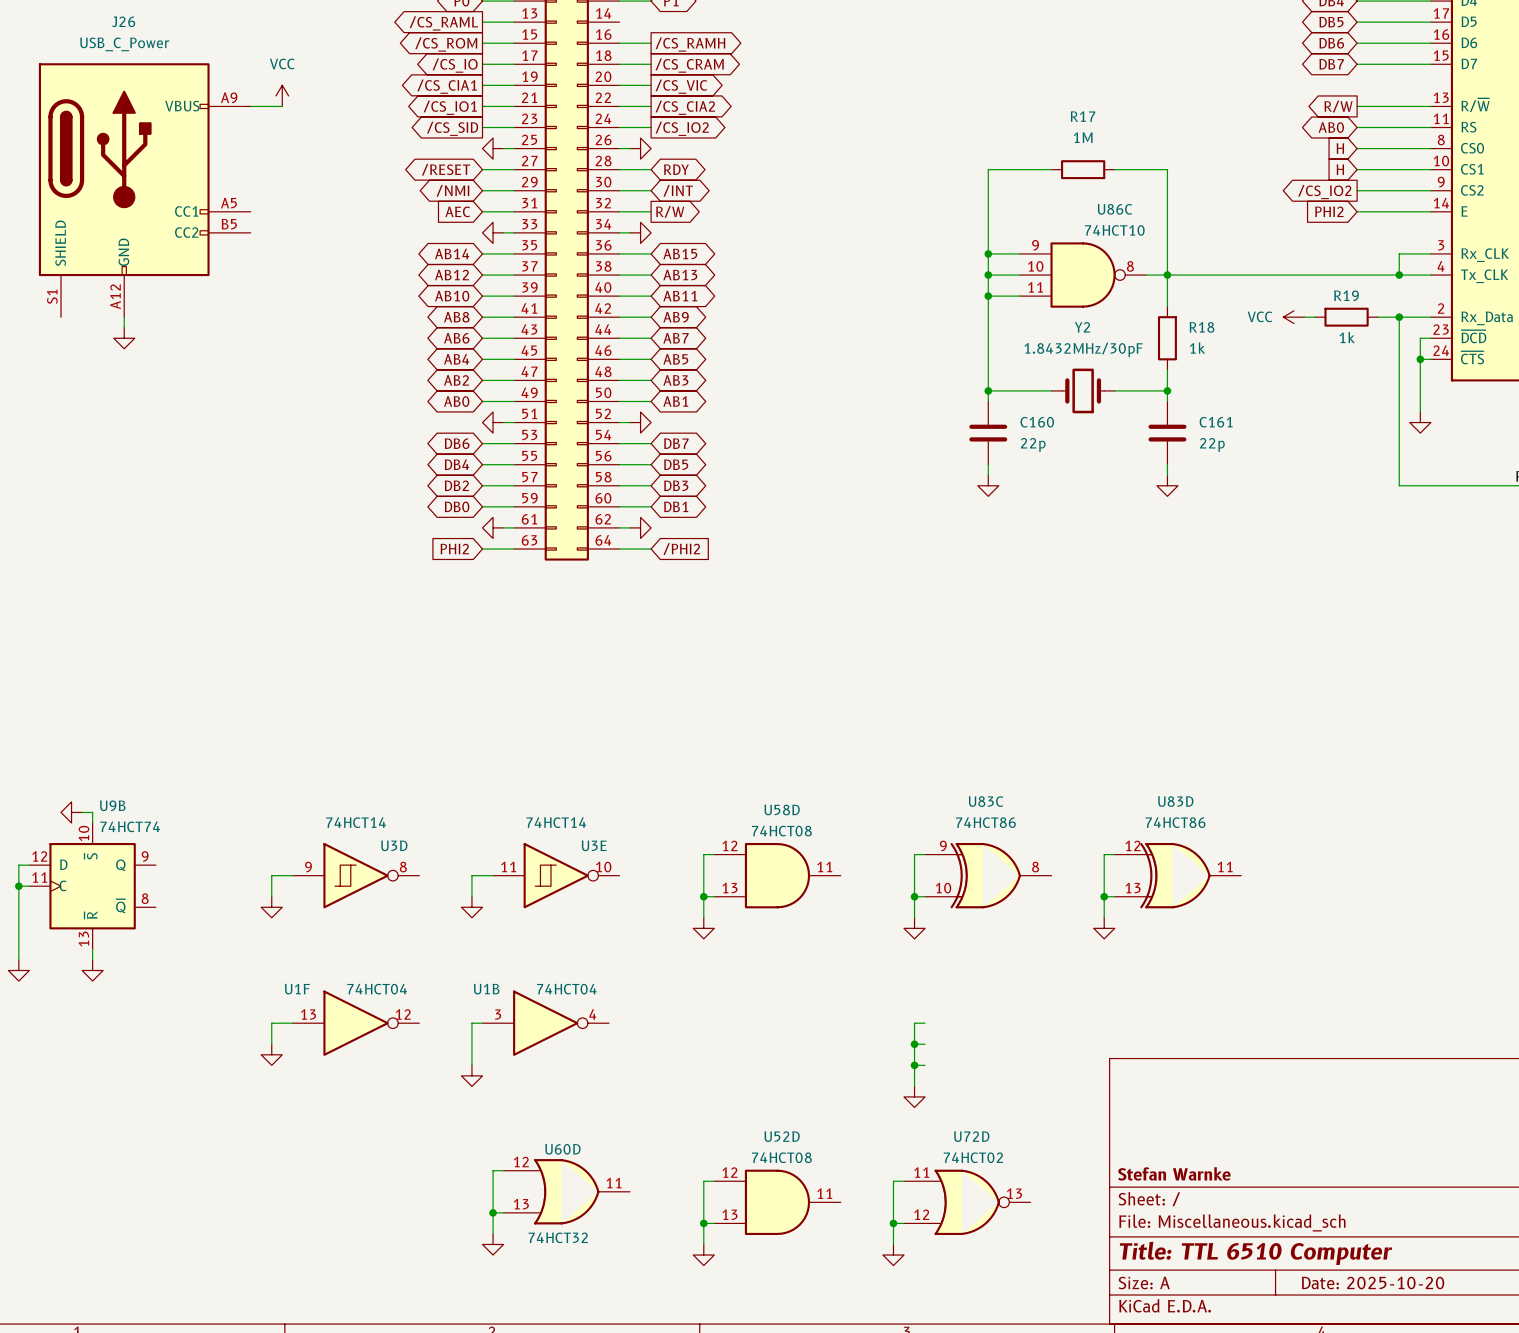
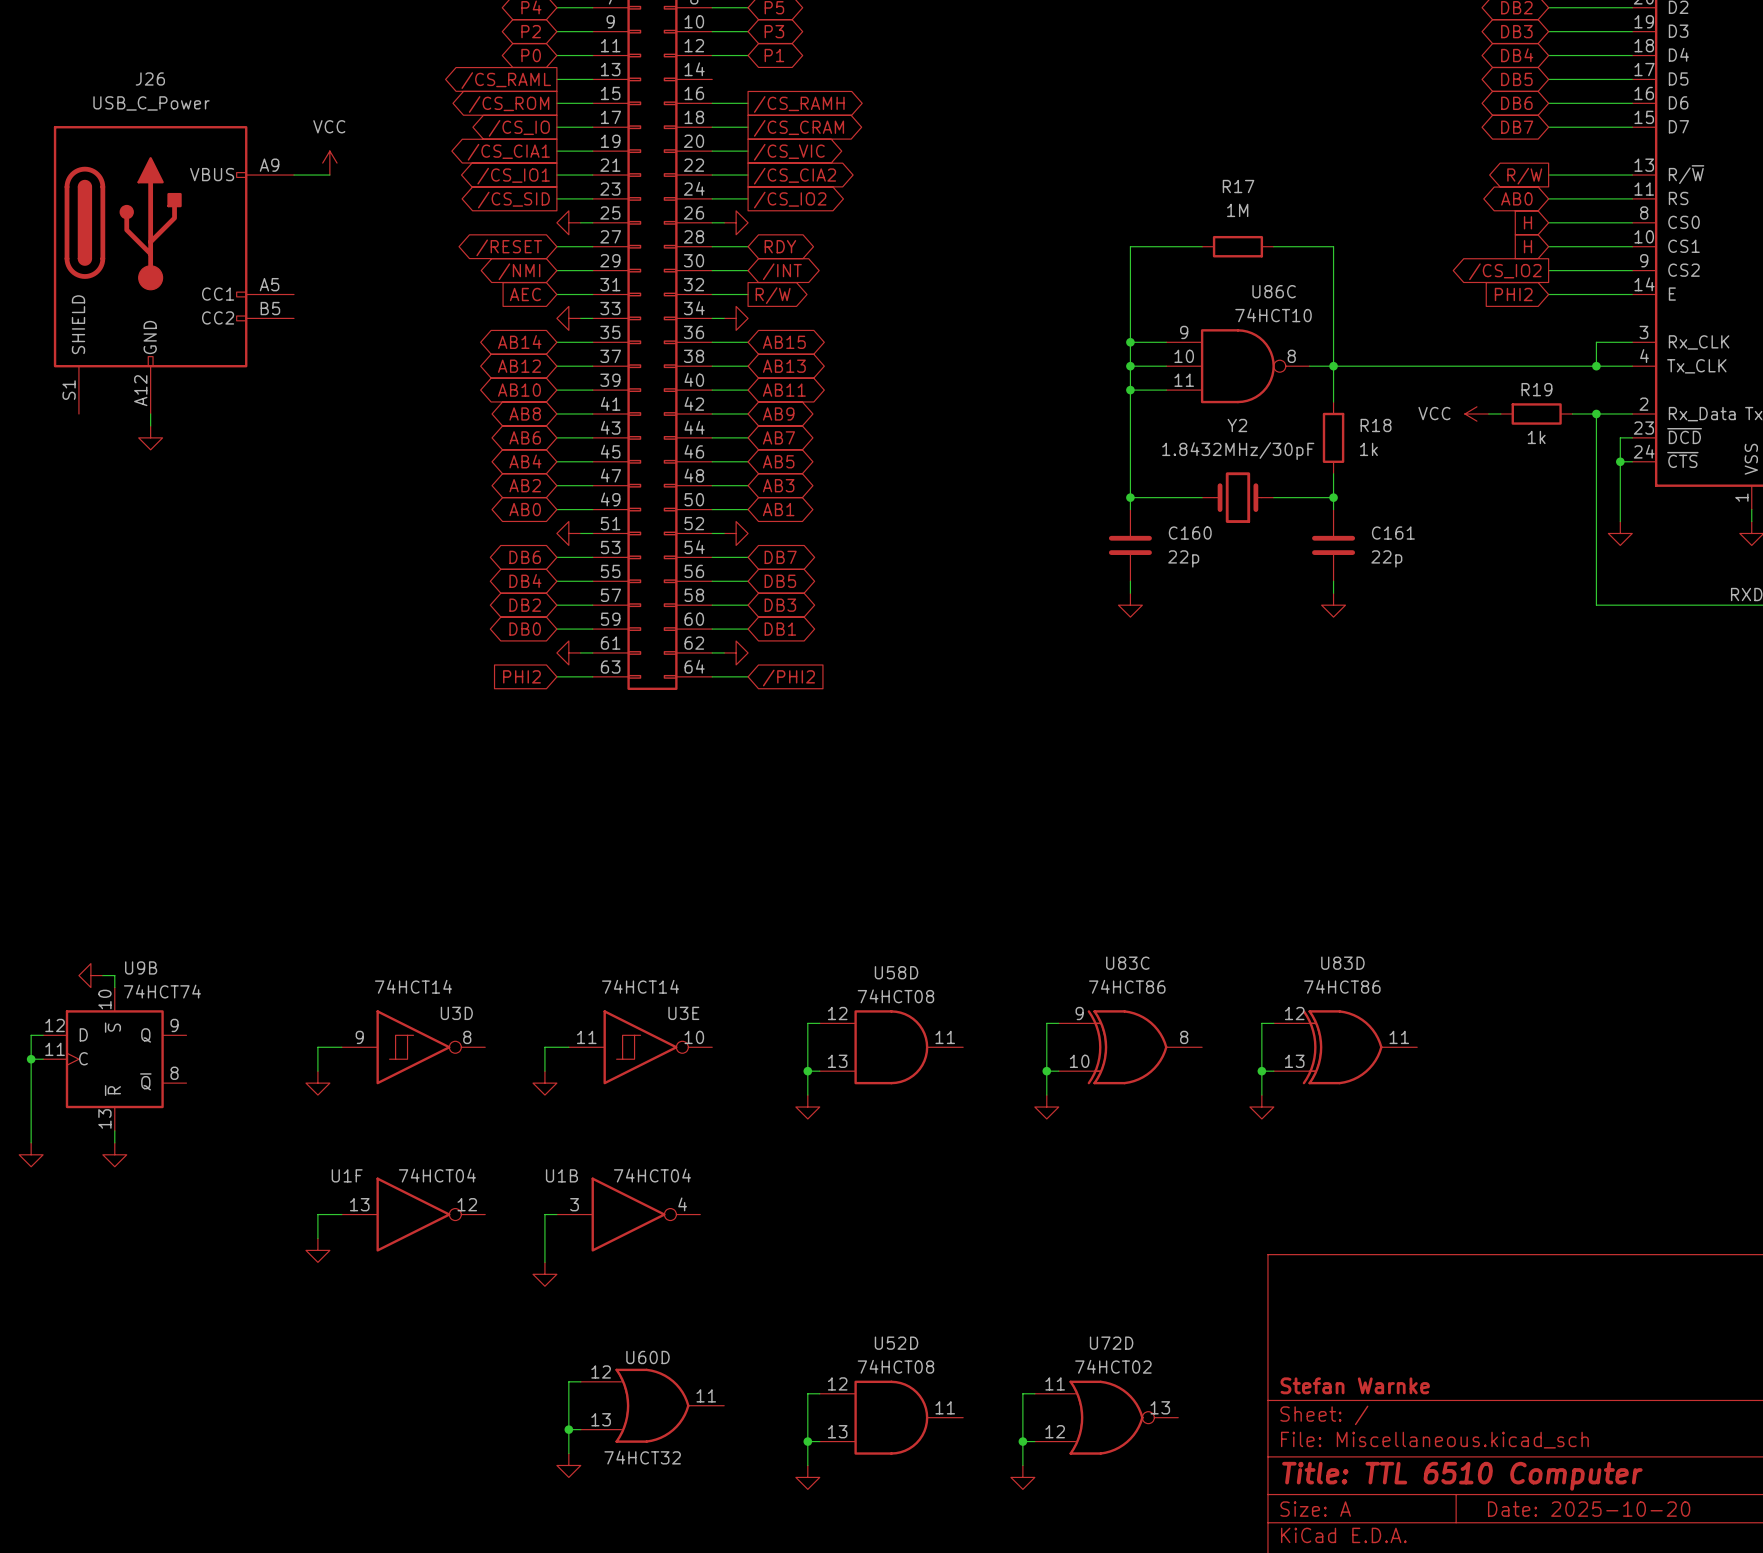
wire: (925, 1023) (914, 1023) (914, 1086) -> none
wire: (914, 1044) (925, 1044) -> none
junction: (914, 1044) -> none
wire: (914, 1065) (925, 1065) -> none
junction: (914, 1065) -> none
power symbol: (914, 1096) -> none

